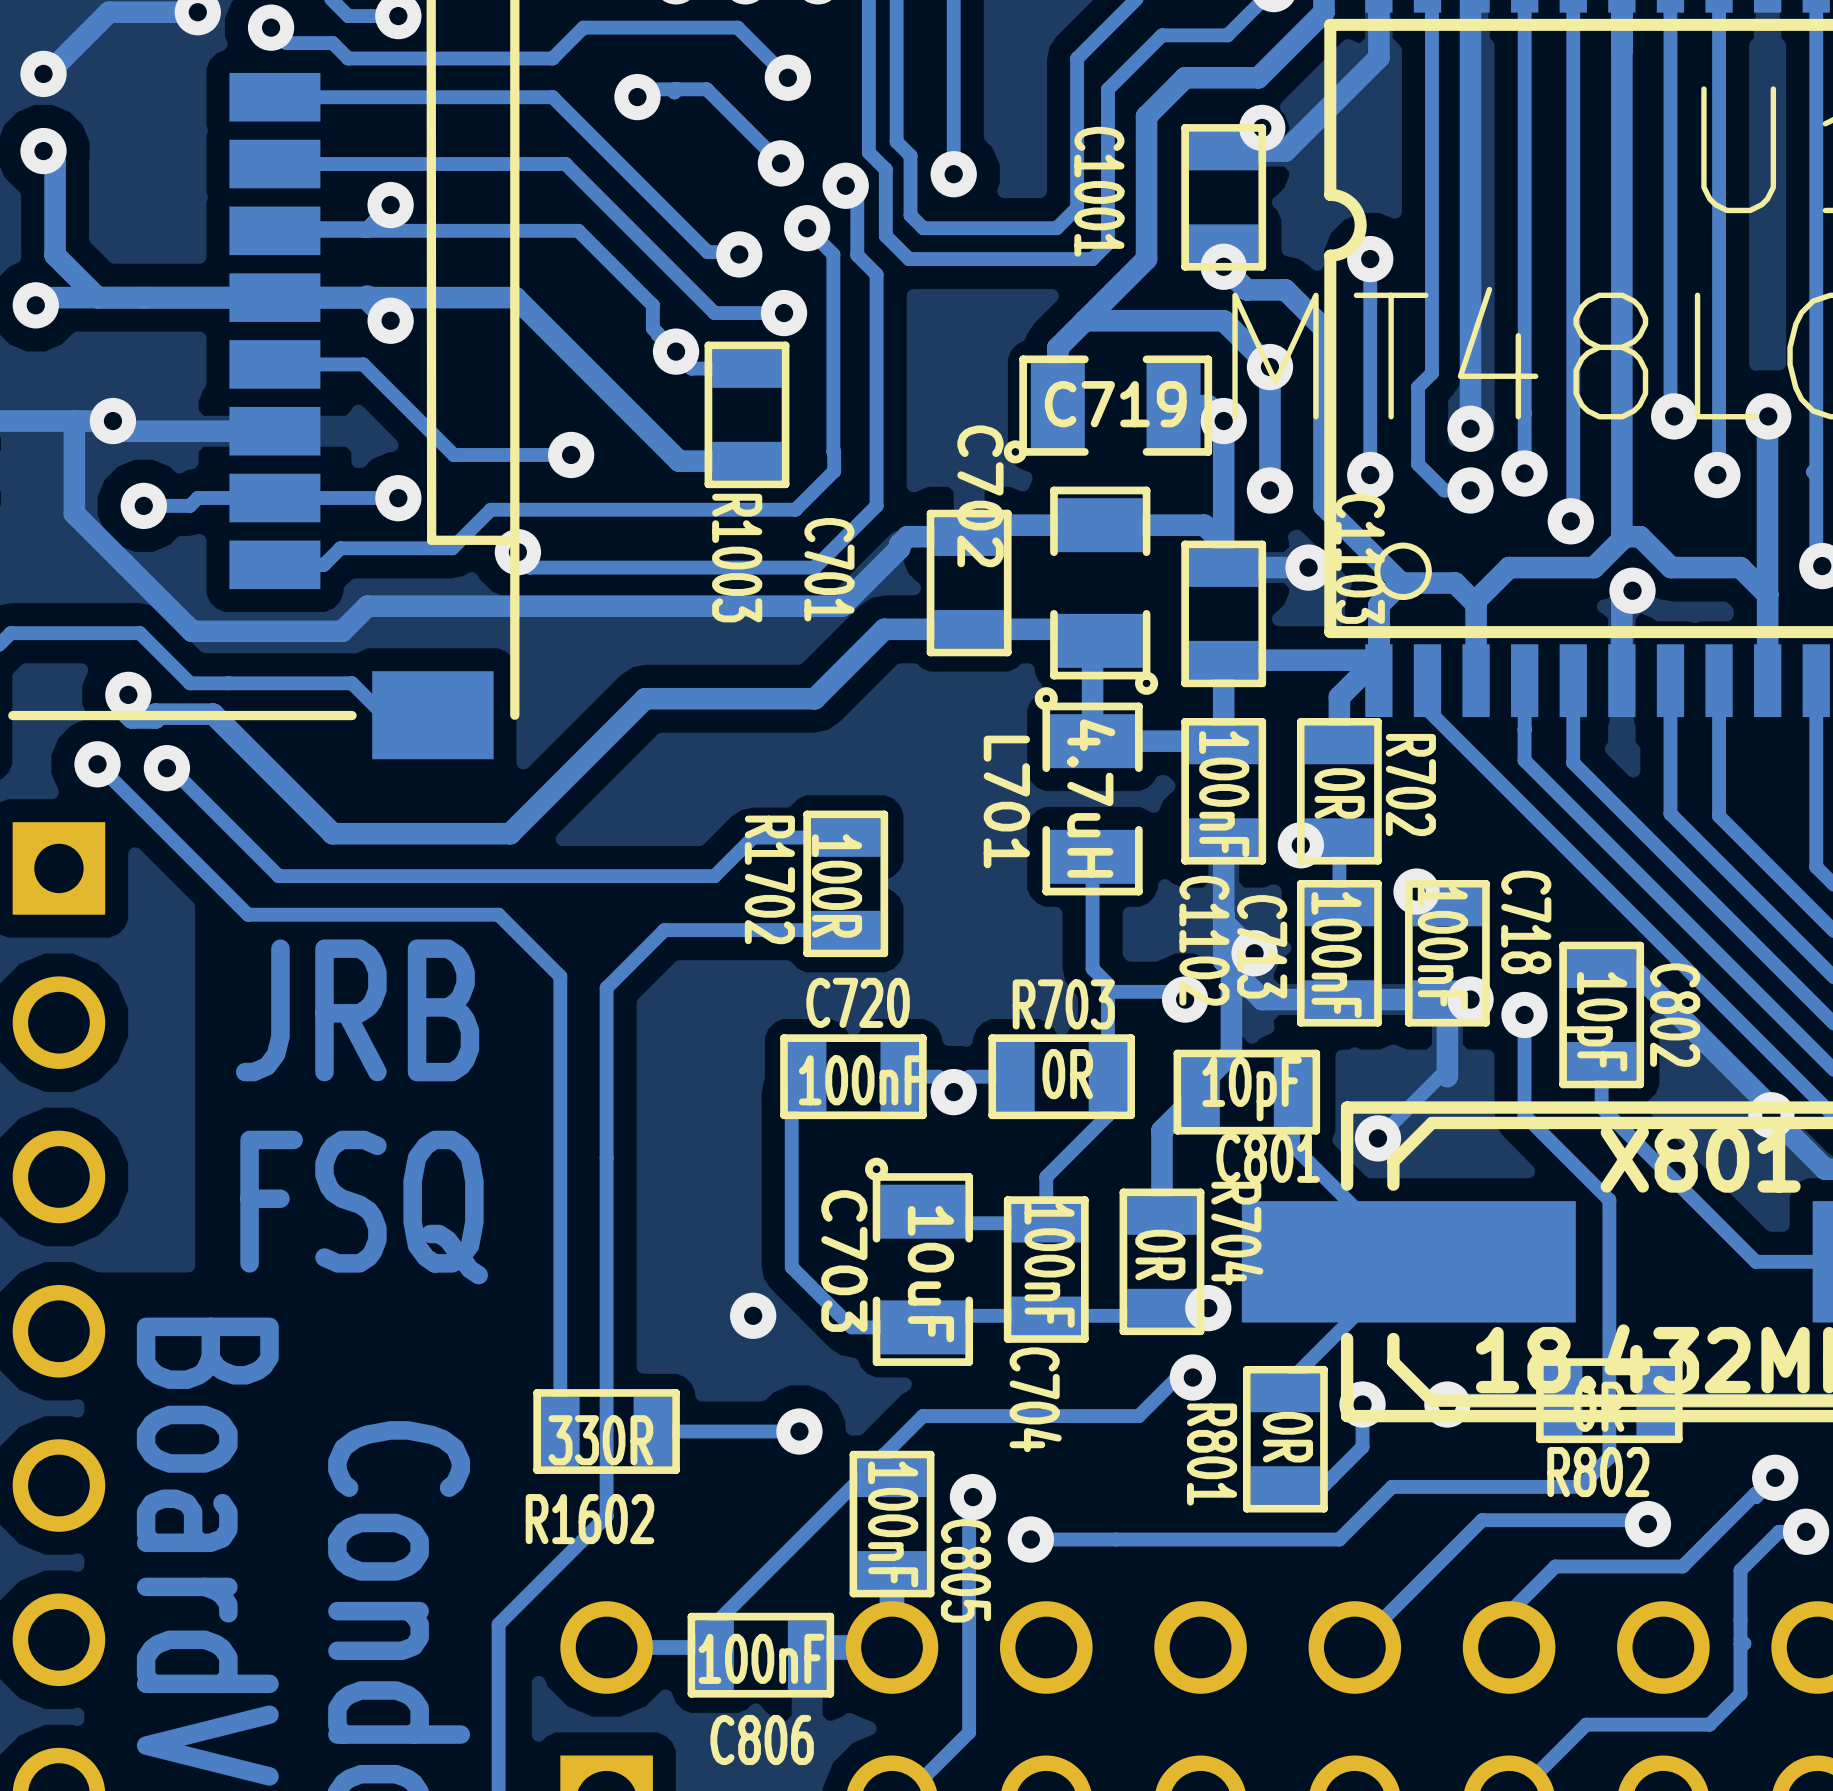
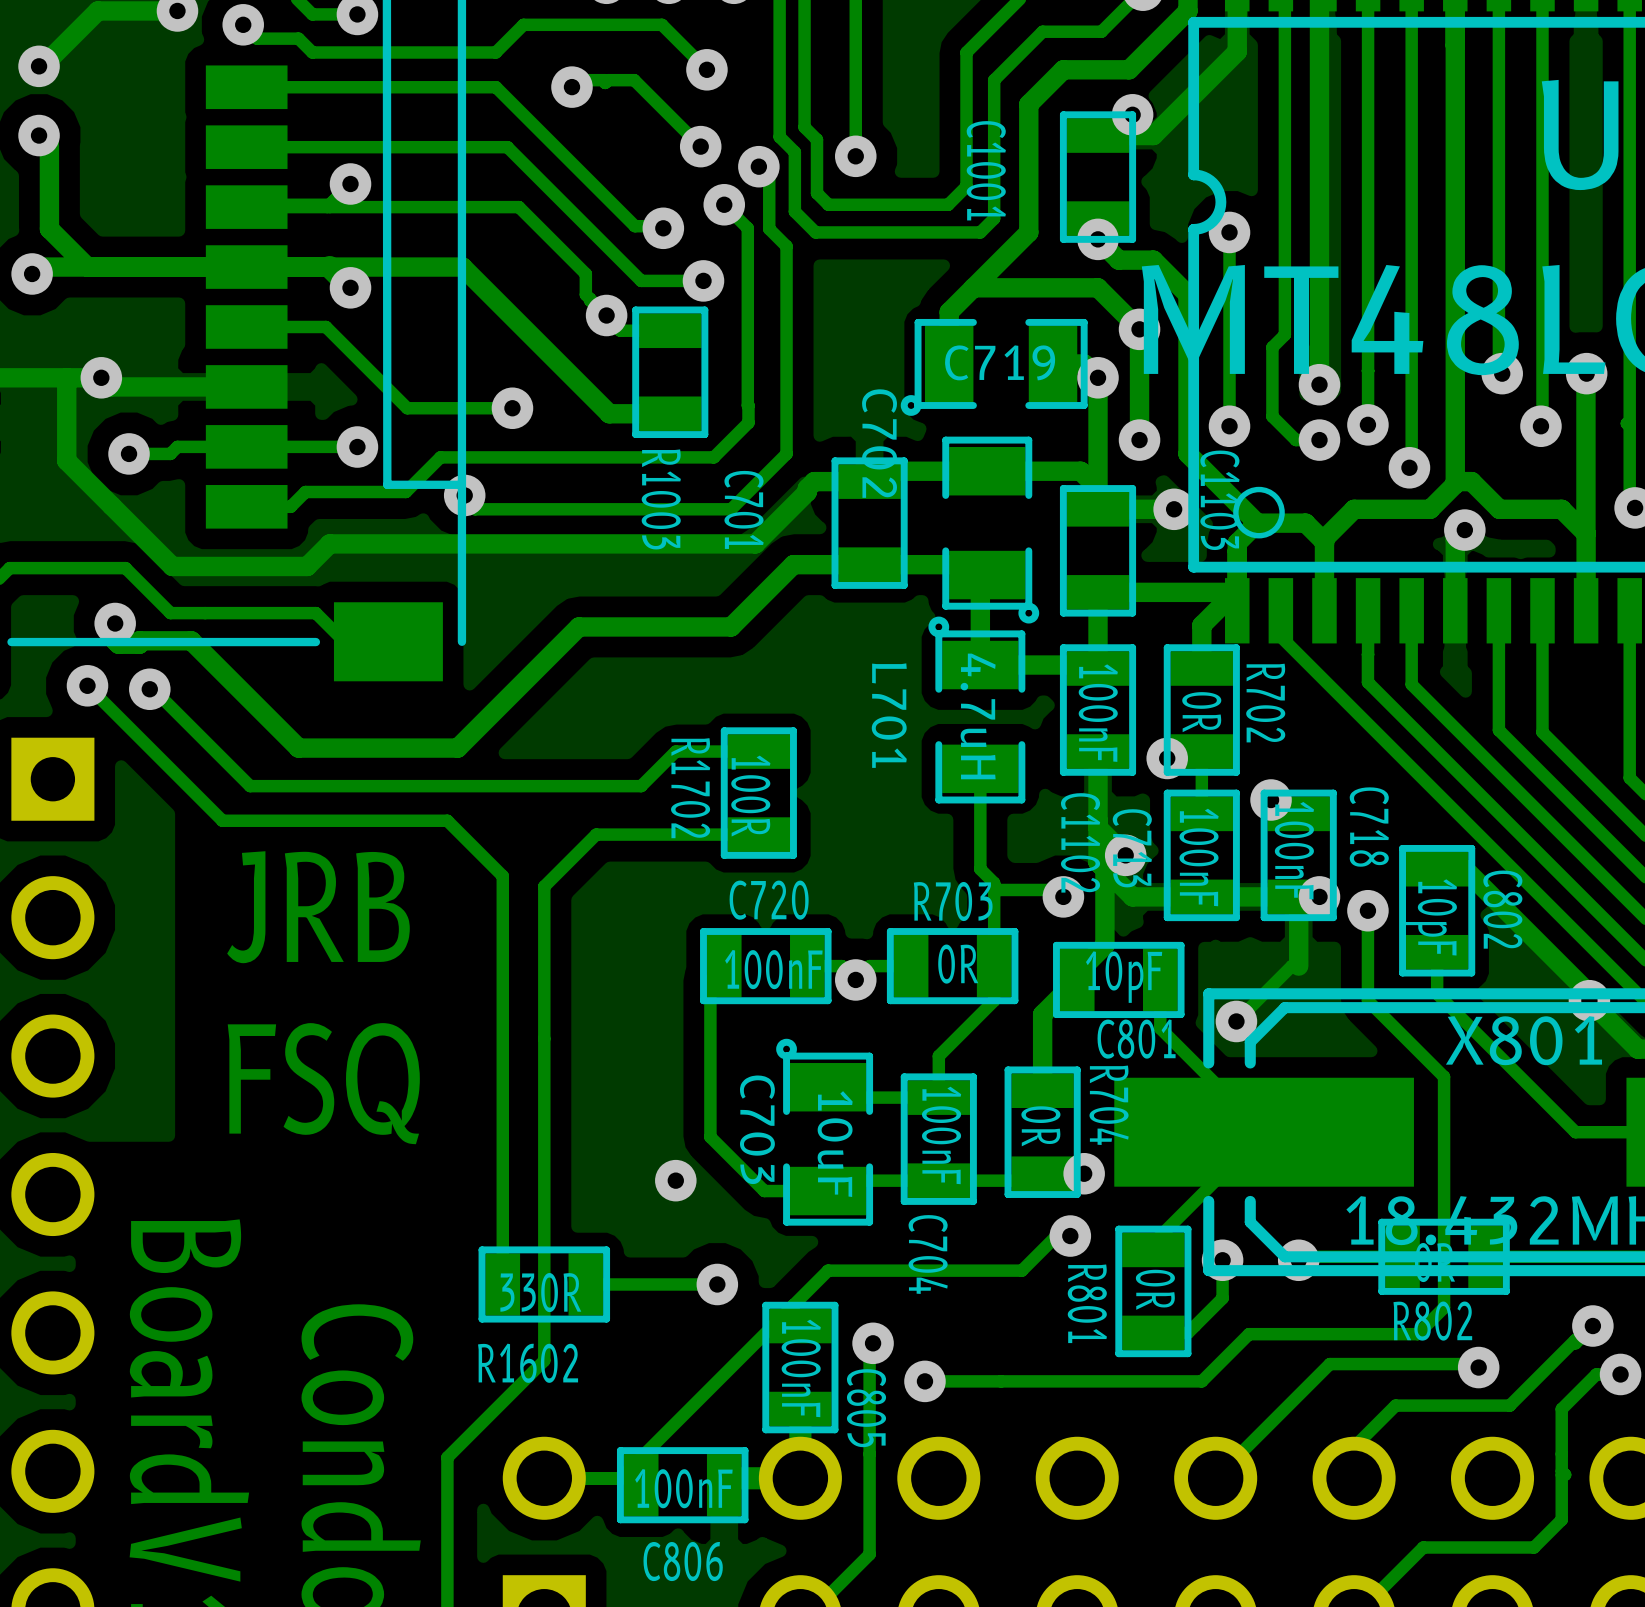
L701 name position: L701 (1006, 801) -> L701 (889, 715)

